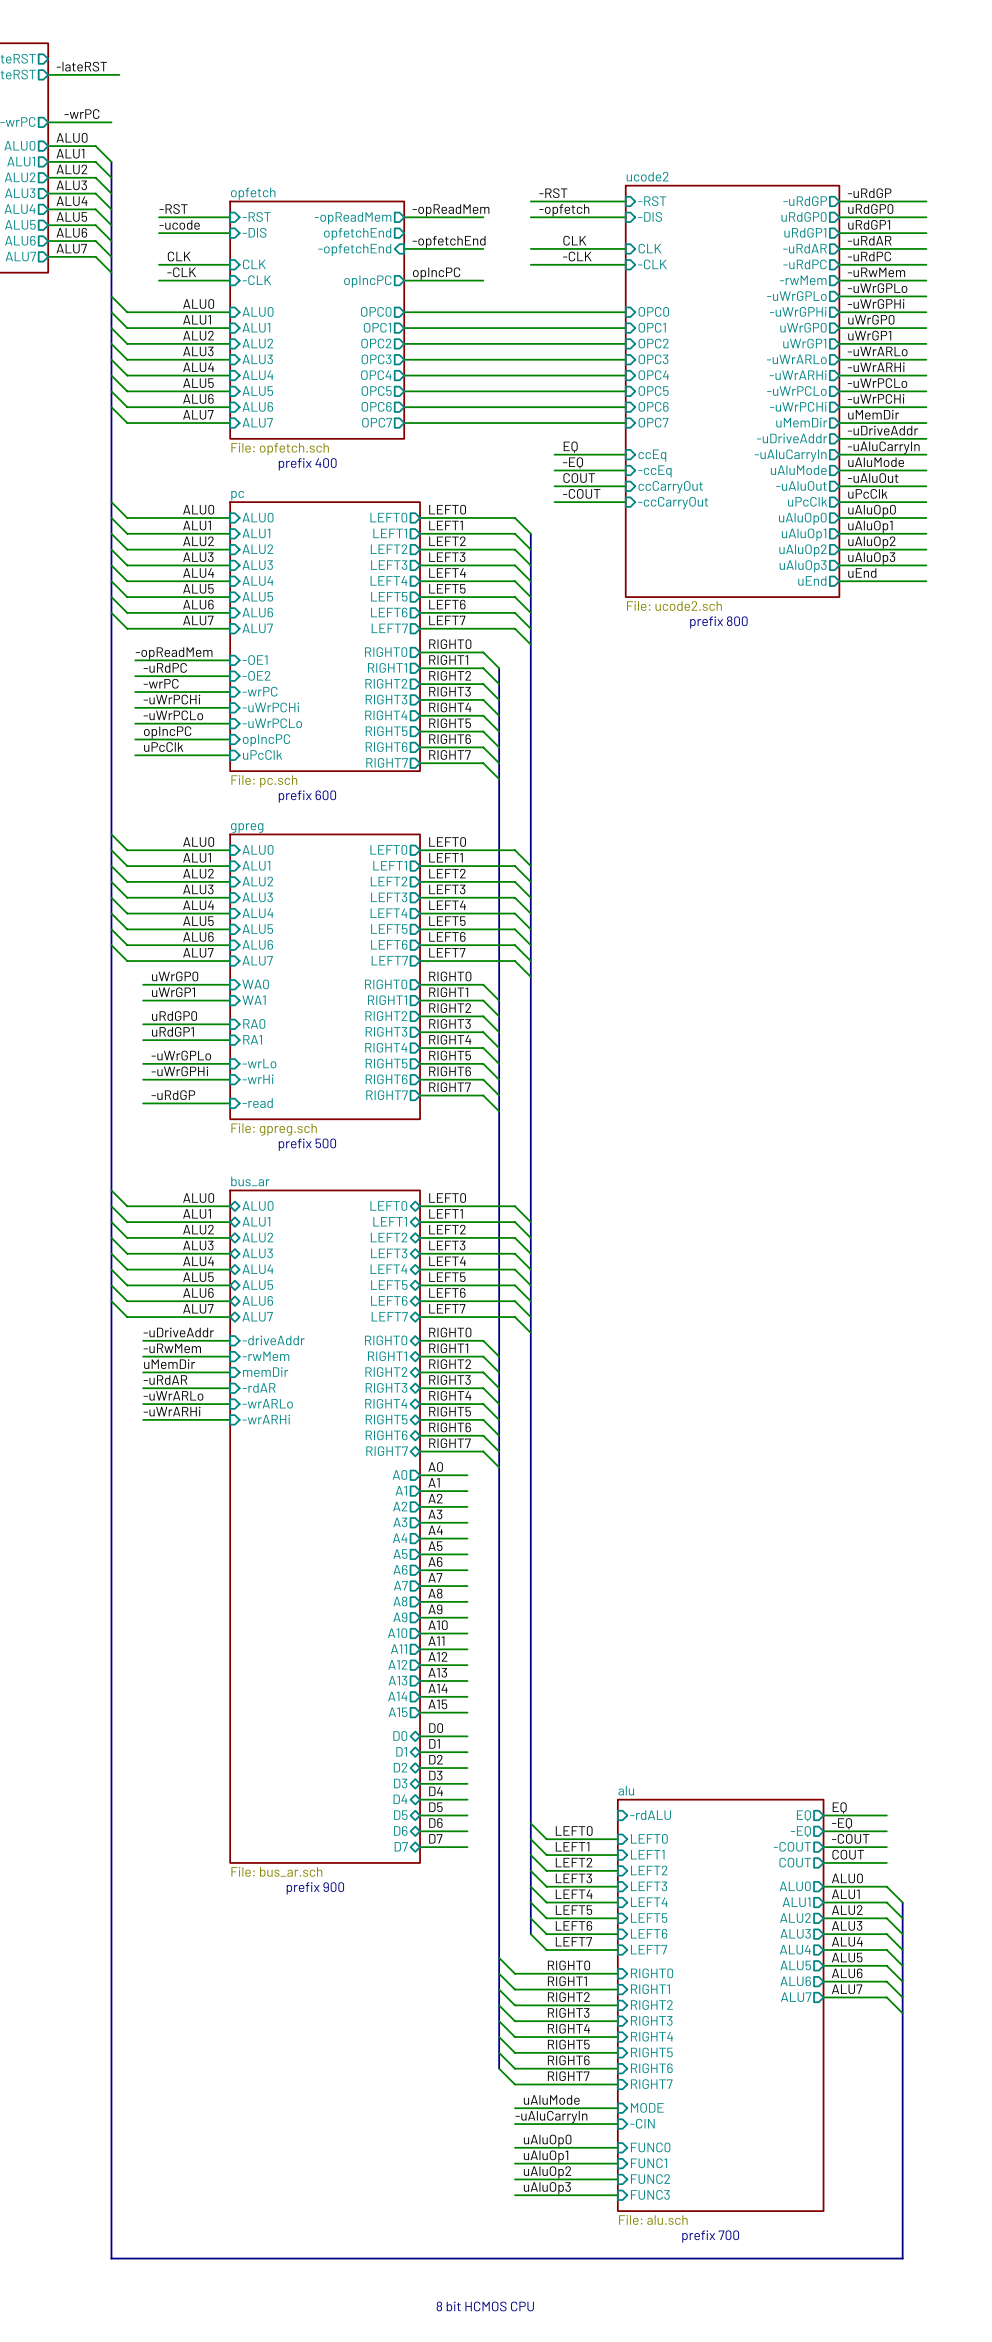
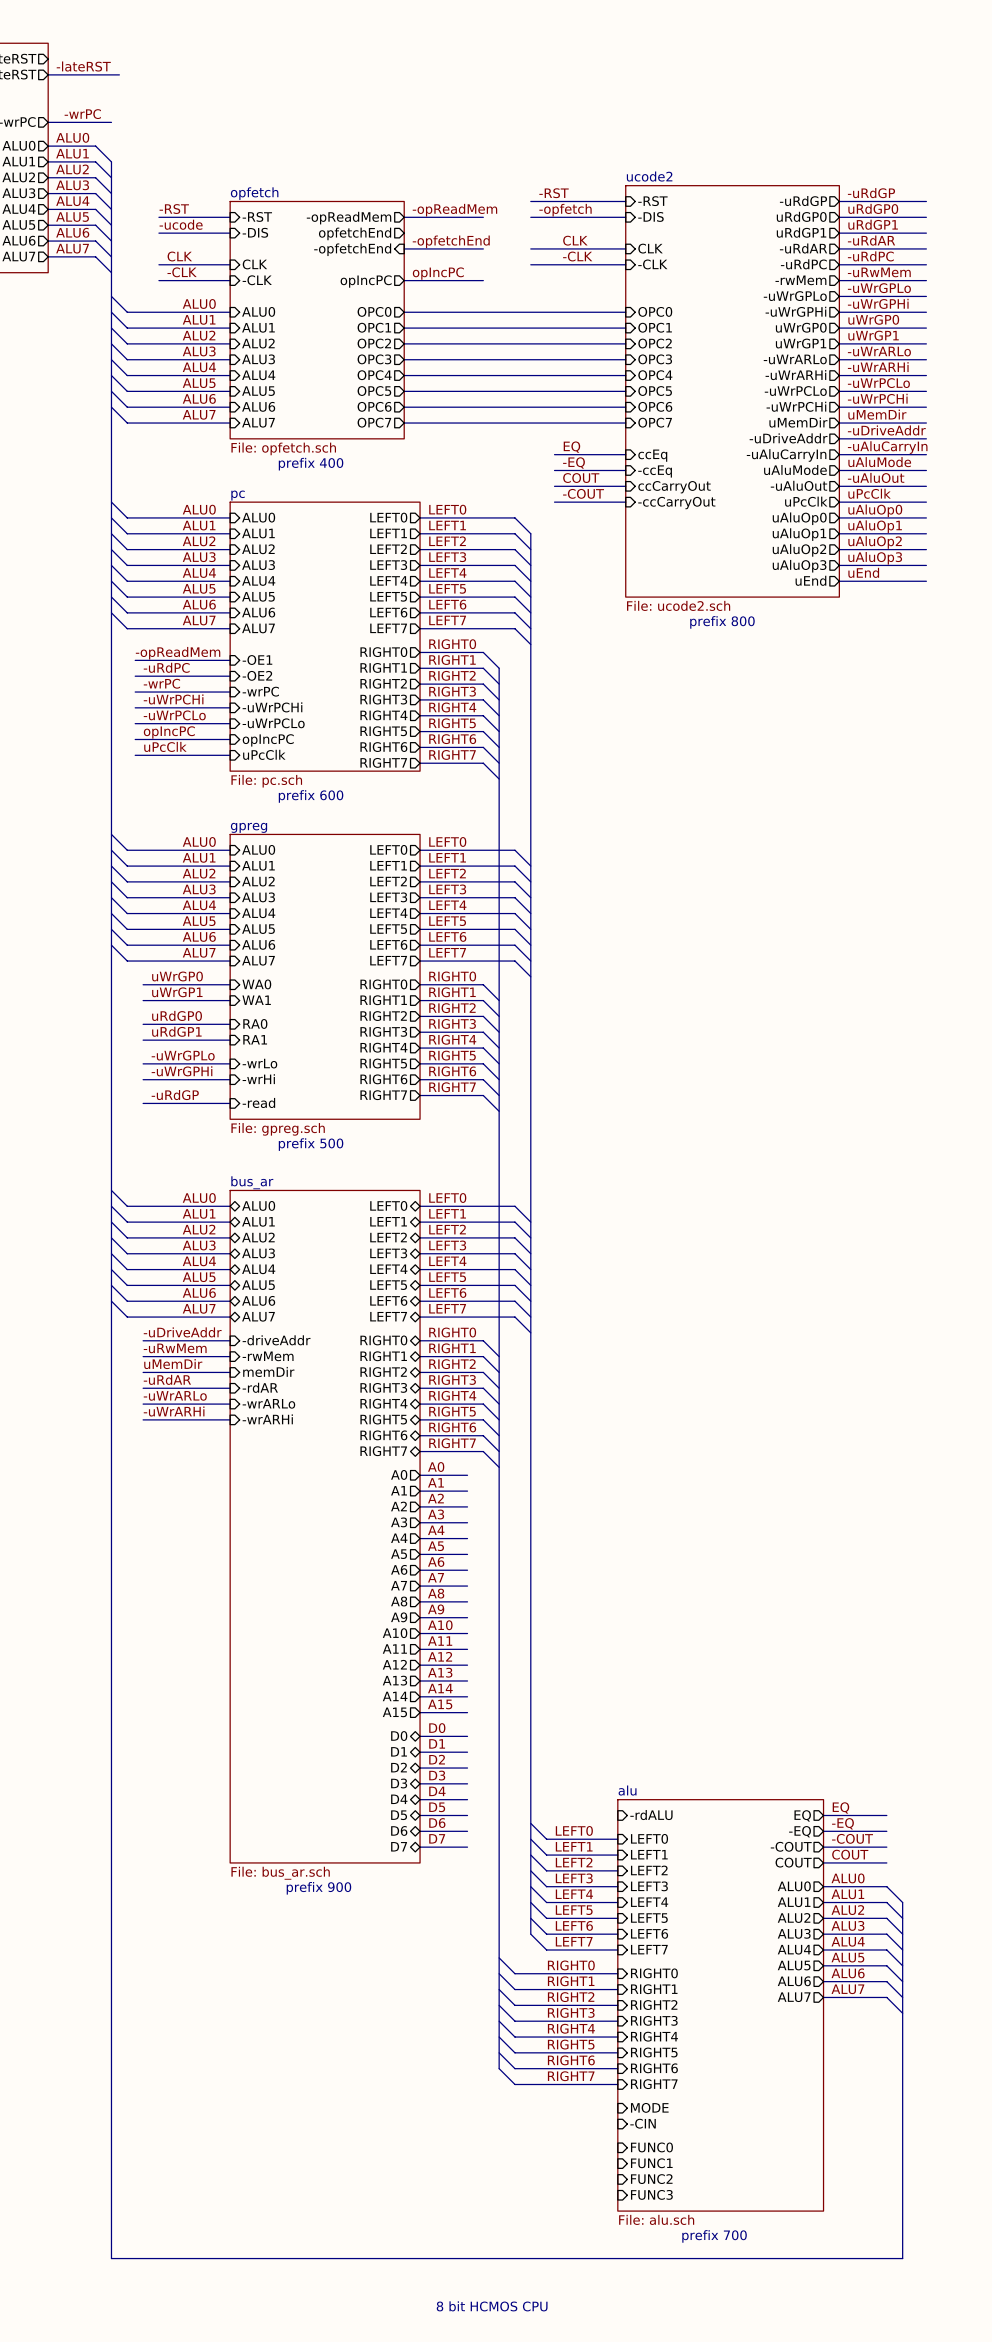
label: uAluMode (551, 2100) -> none
wire: (514, 2108) (617, 2108) -> none
label: -uAluCarryIn (551, 2117) -> none
wire: (514, 2124) (617, 2124) -> none
label: uAluOp0 (547, 2140) -> none
wire: (514, 2147) (617, 2147) -> none
label: uAluOp1 (546, 2156) -> none
wire: (514, 2163) (617, 2163) -> none
label: uAluOp2 (547, 2172) -> none
wire: (514, 2179) (617, 2179) -> none
label: uAluOp3 (547, 2188) -> none
wire: (514, 2195) (617, 2195) -> none

